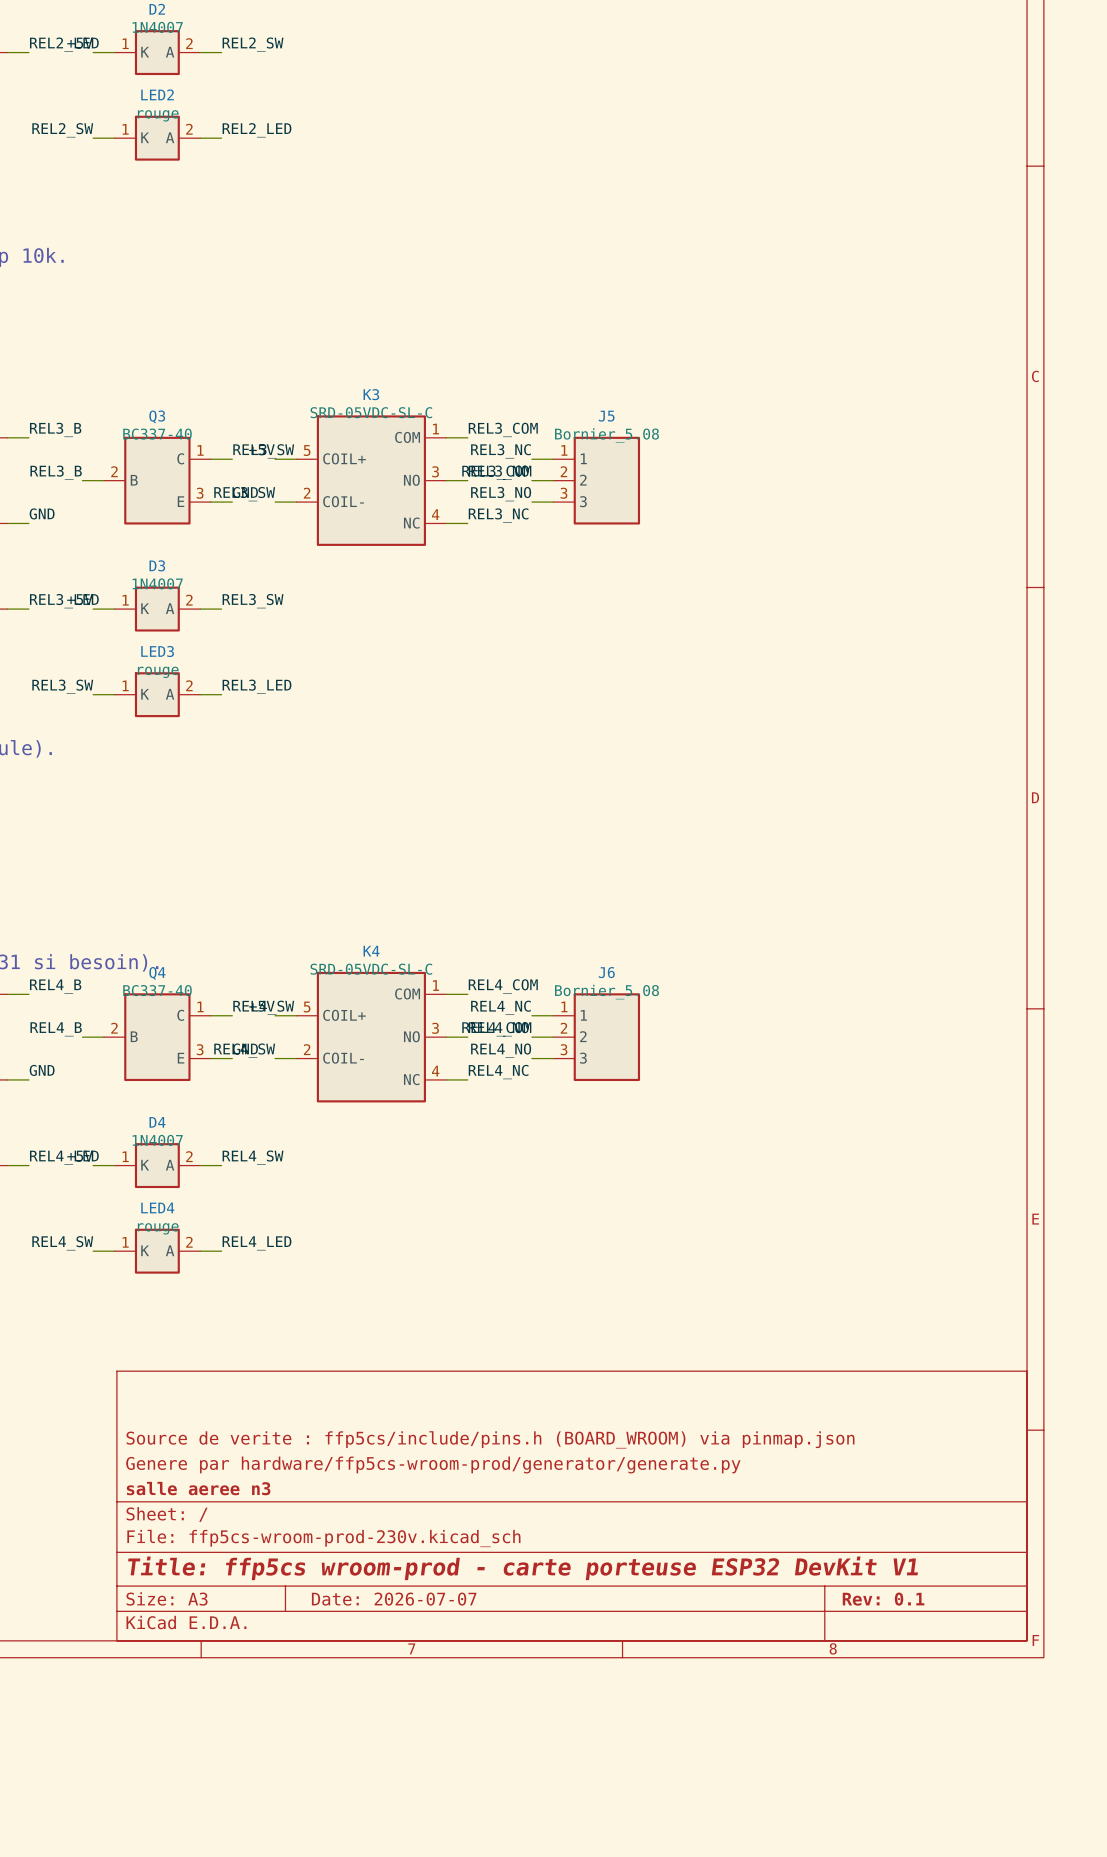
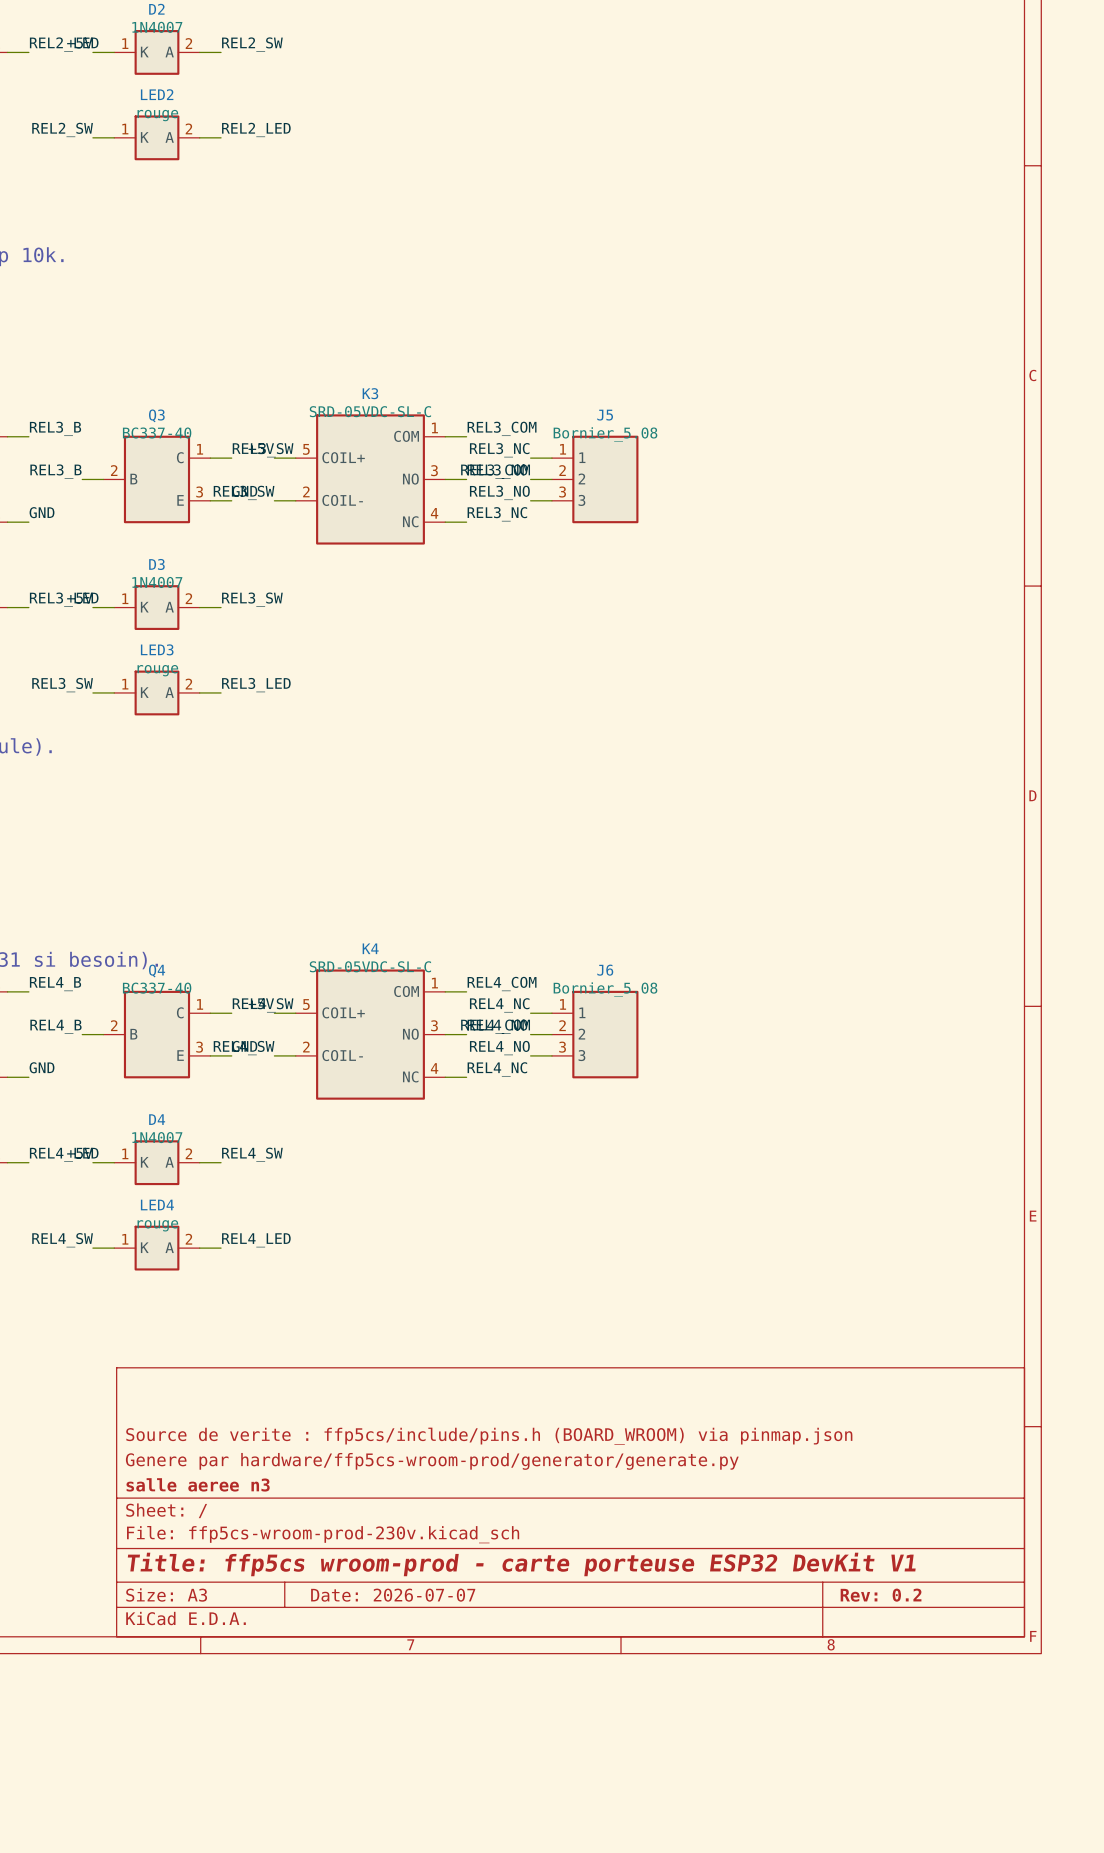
title block: Rev: 0.1 (883, 1599) -> Rev: 0.2 (881, 1595)

